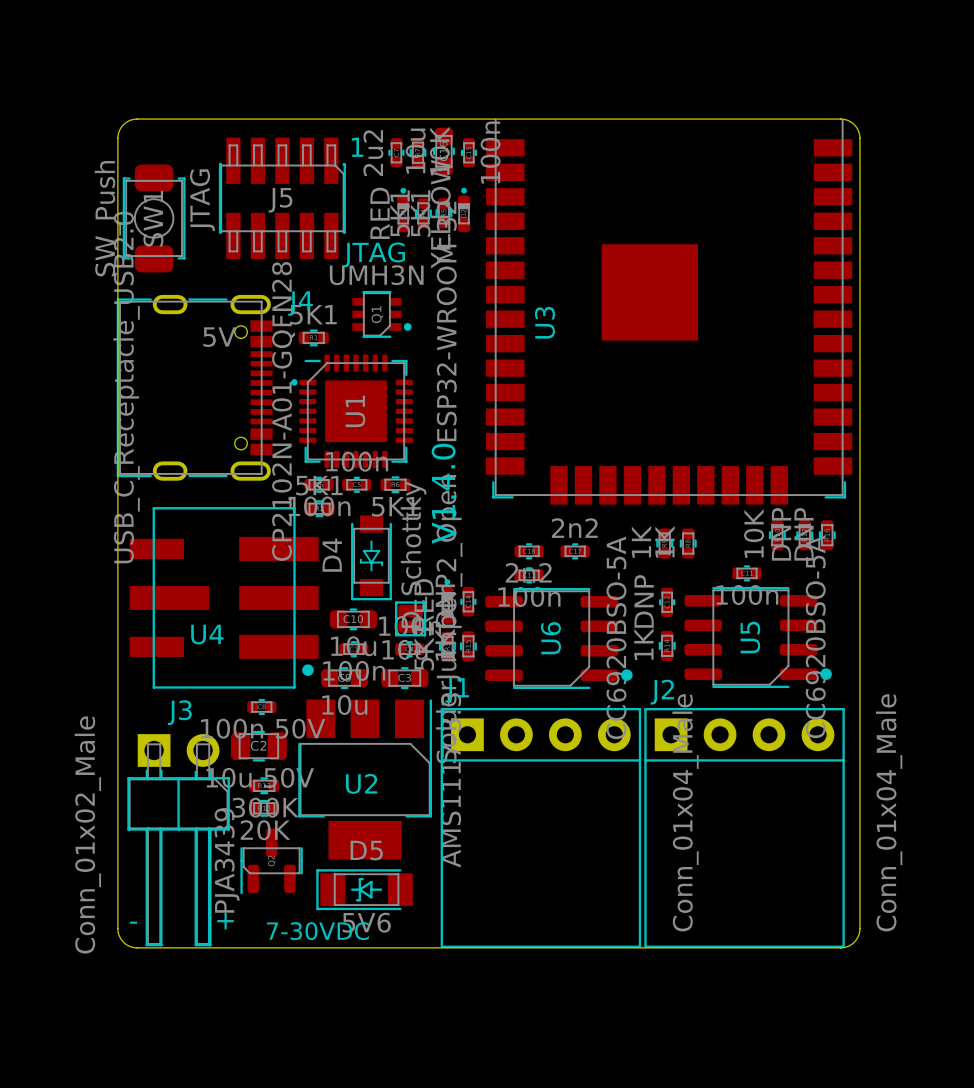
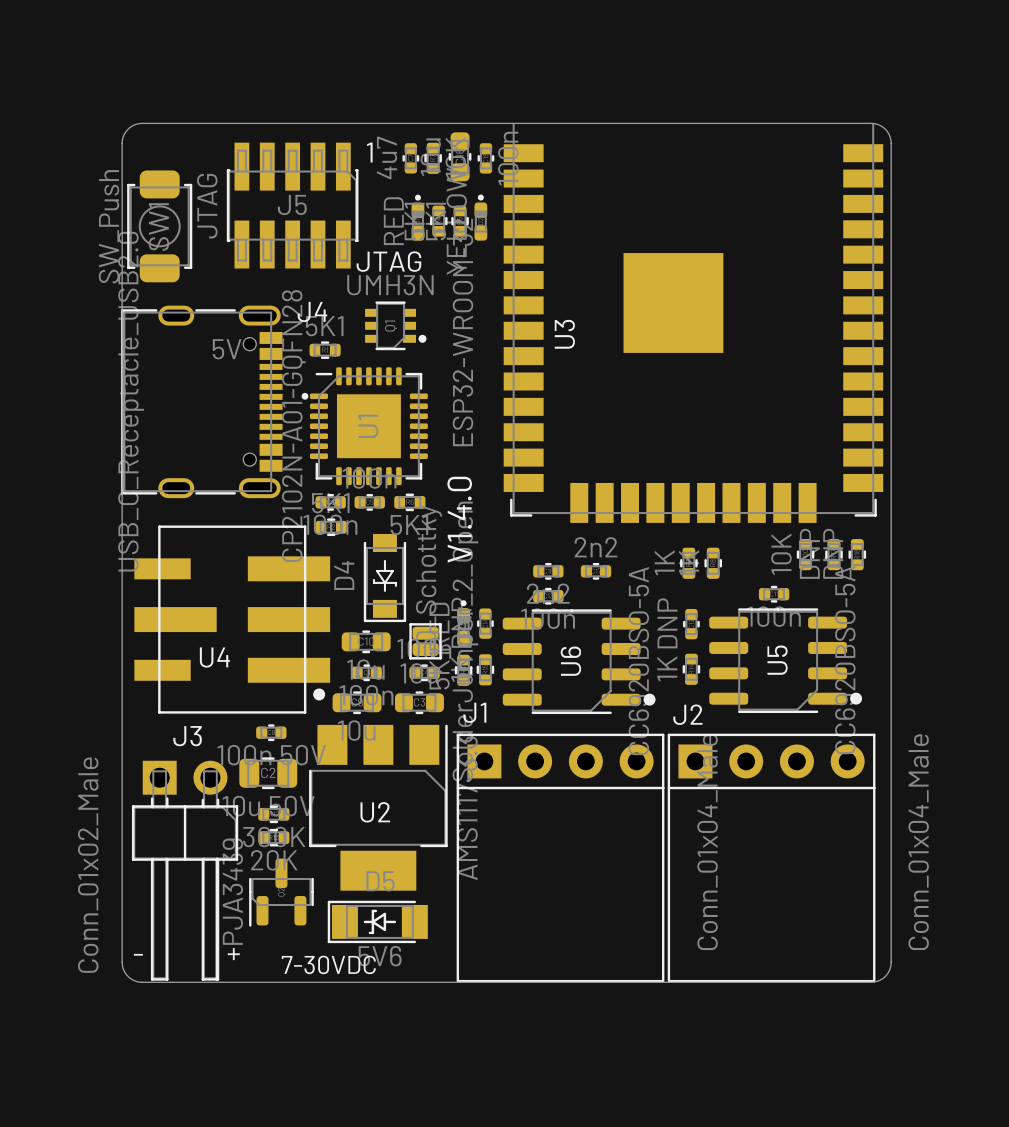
part value: 2u2 (373, 153) -> 4u7 (387, 157)

